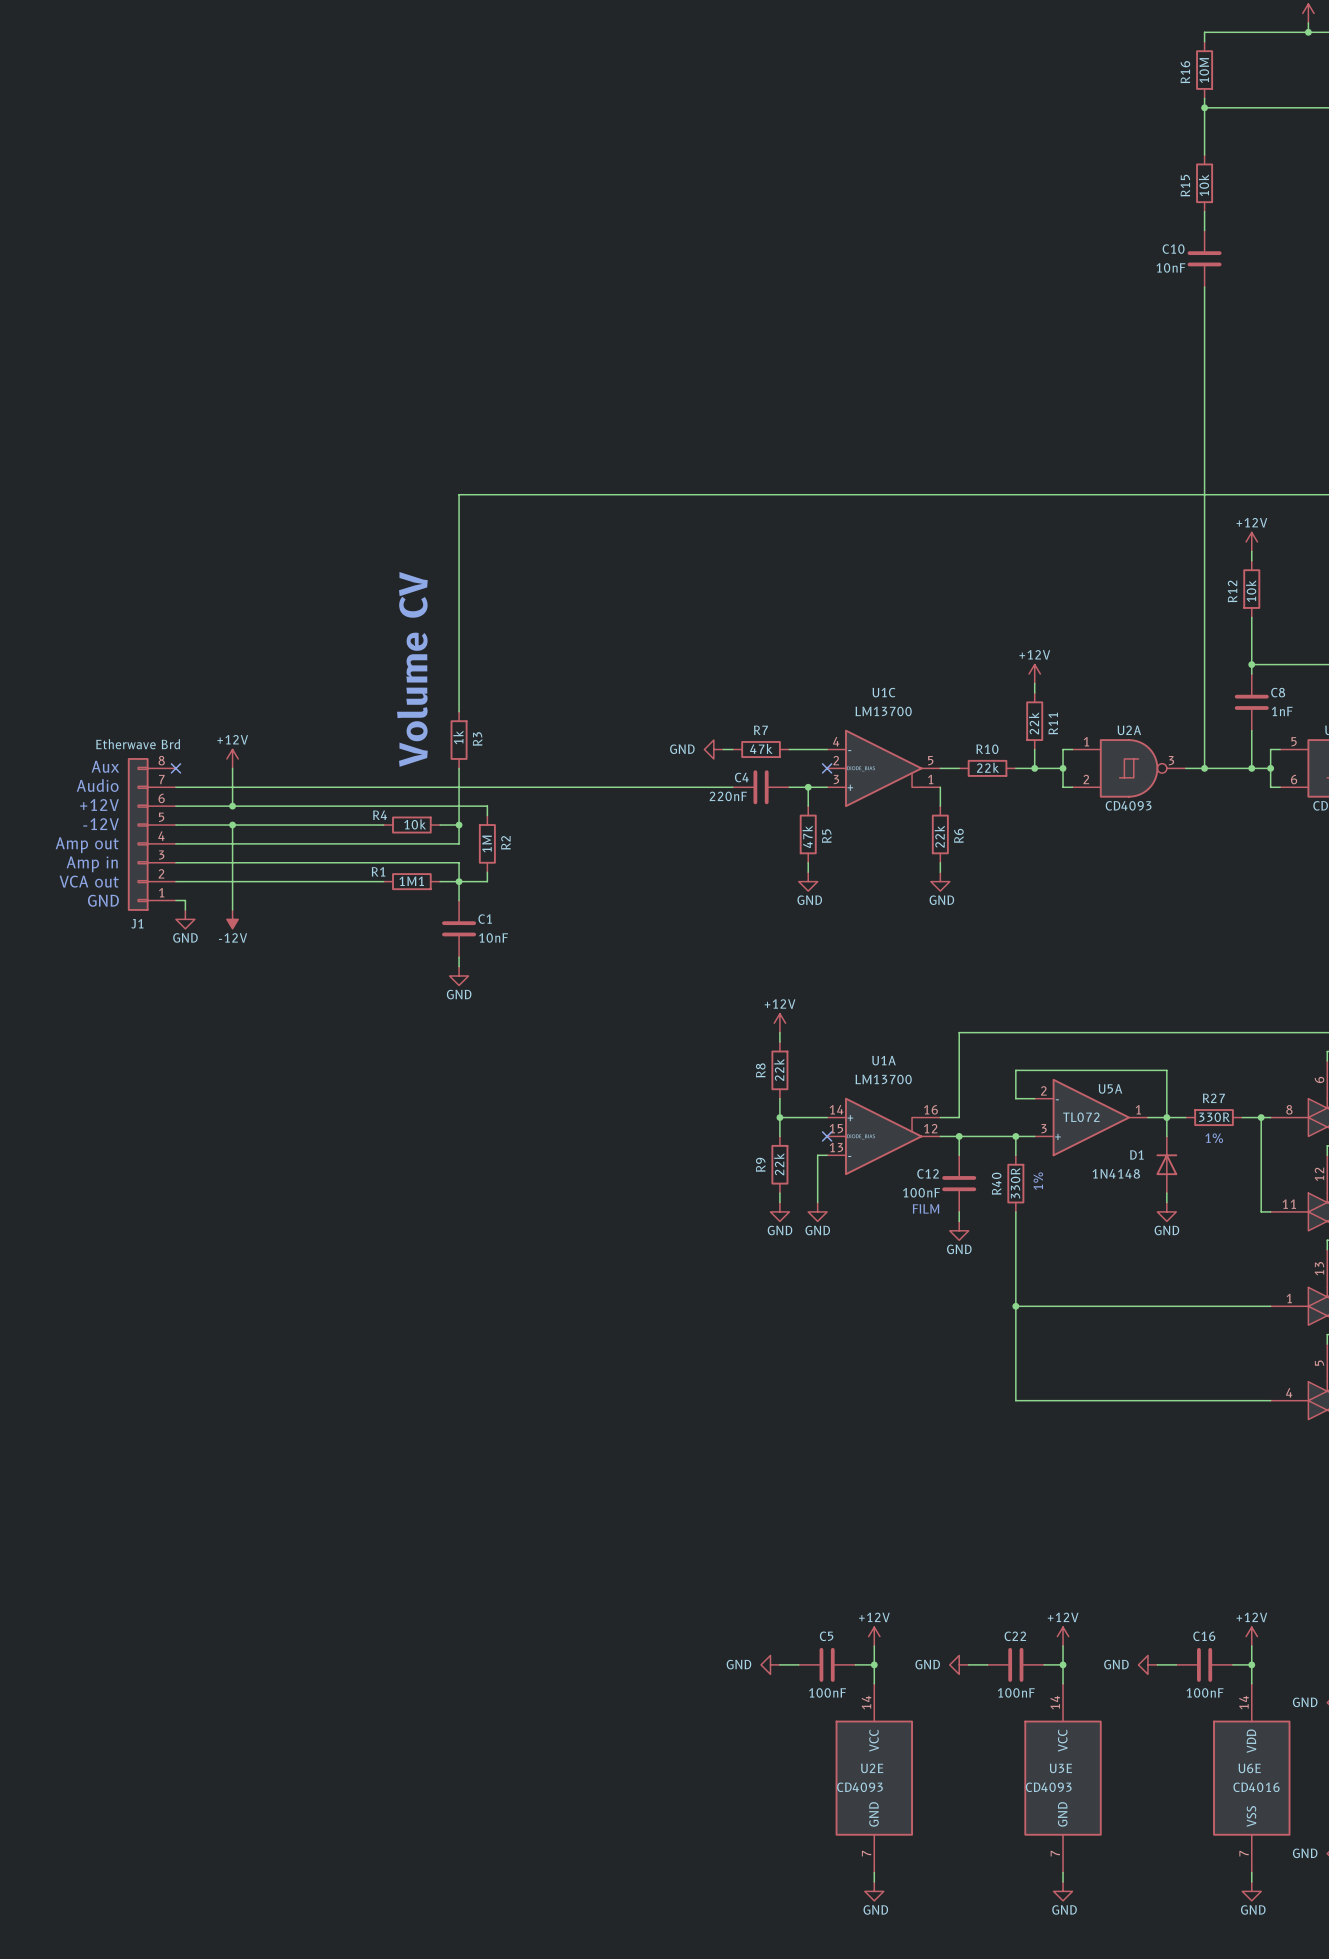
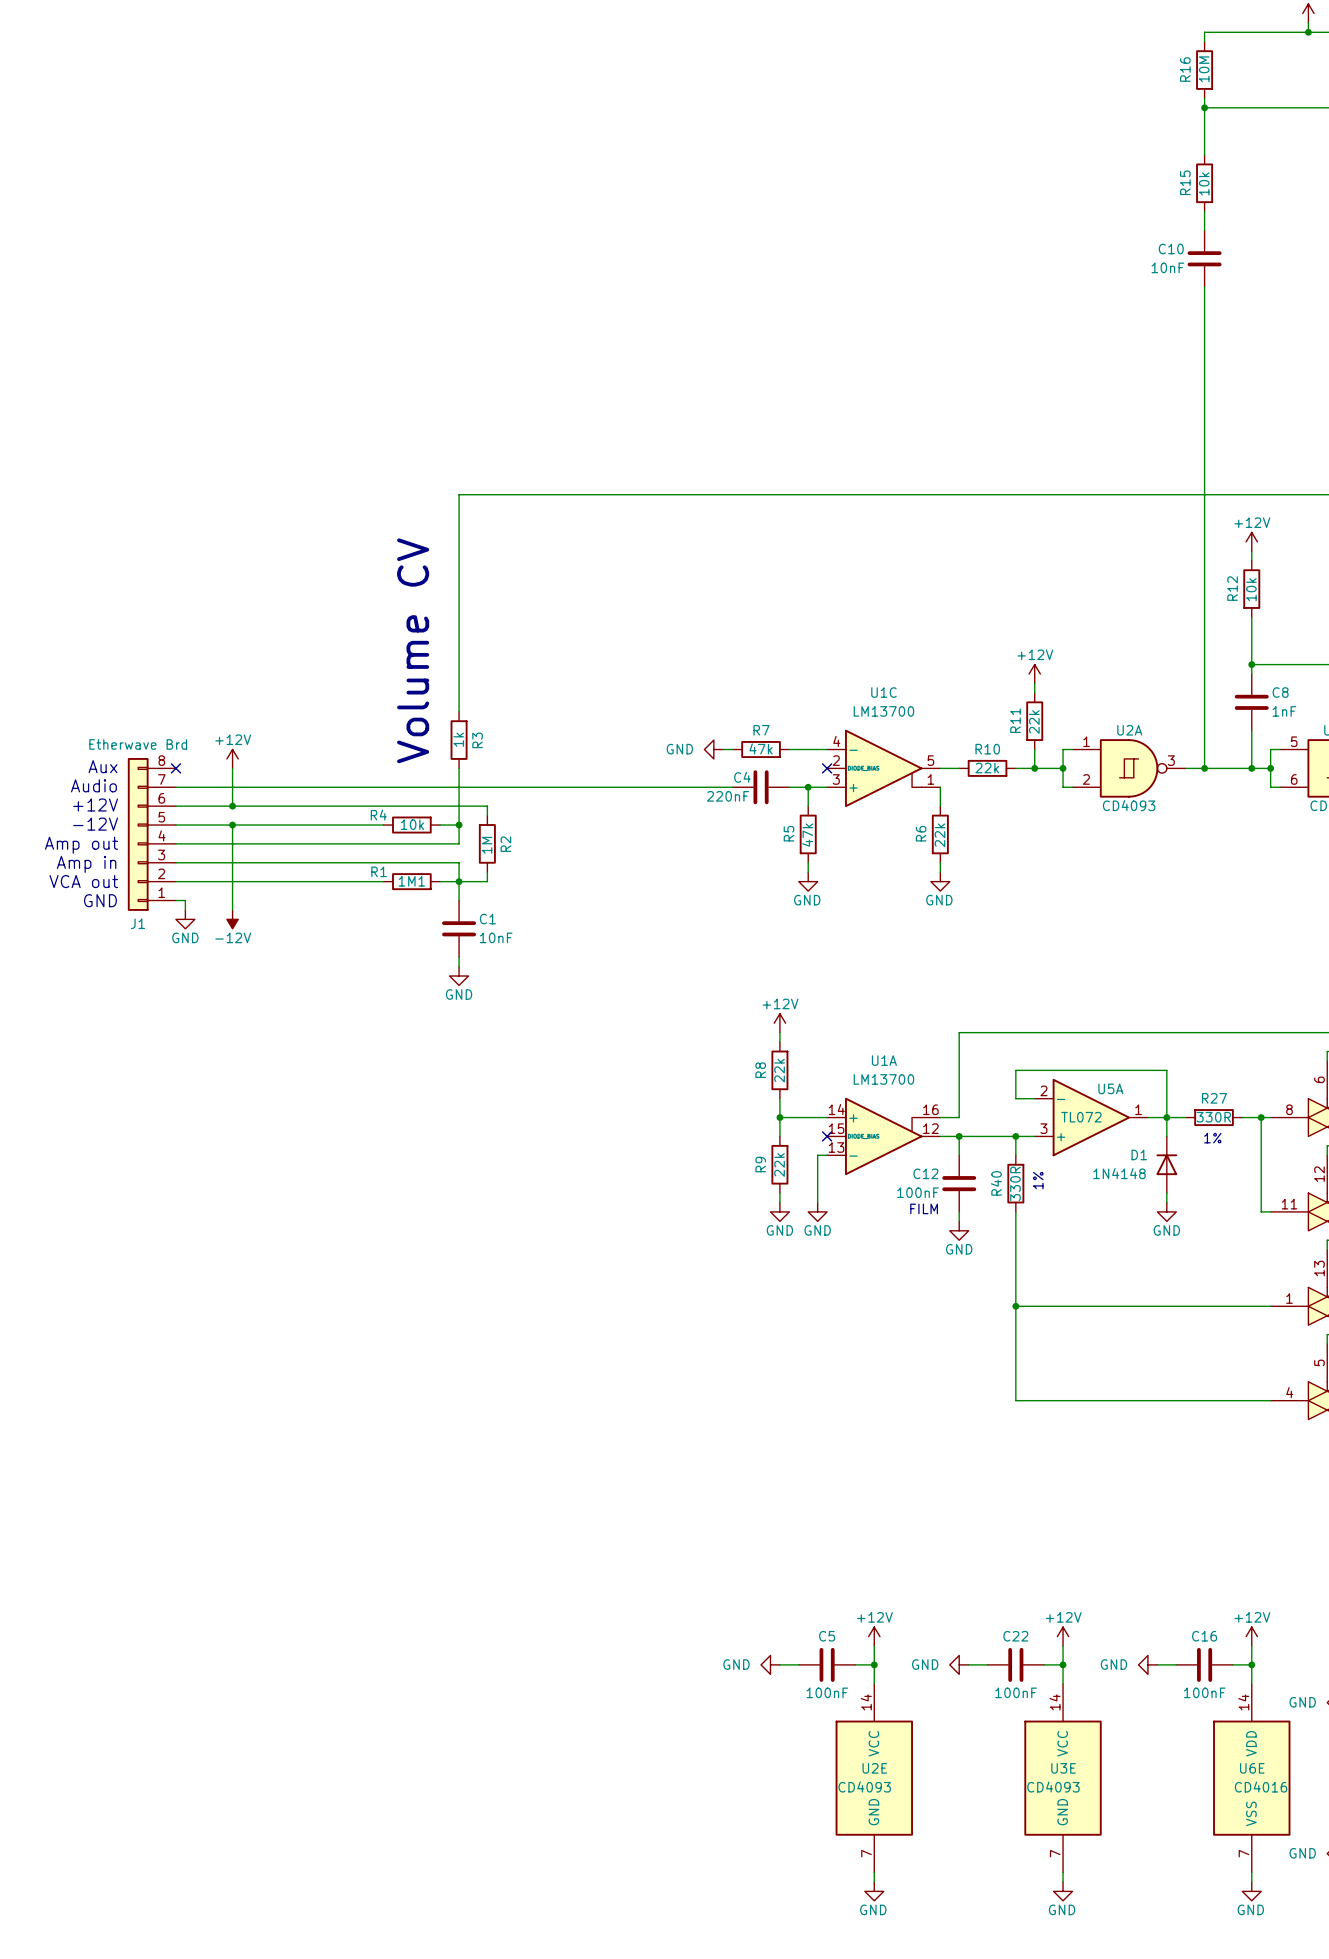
R11 name position: R11 (1053, 723) -> R11 (1015, 720)
R6 name position: R6 (958, 835) -> R6 (921, 833)
R5 name position: R5 (826, 836) -> R5 (789, 833)

